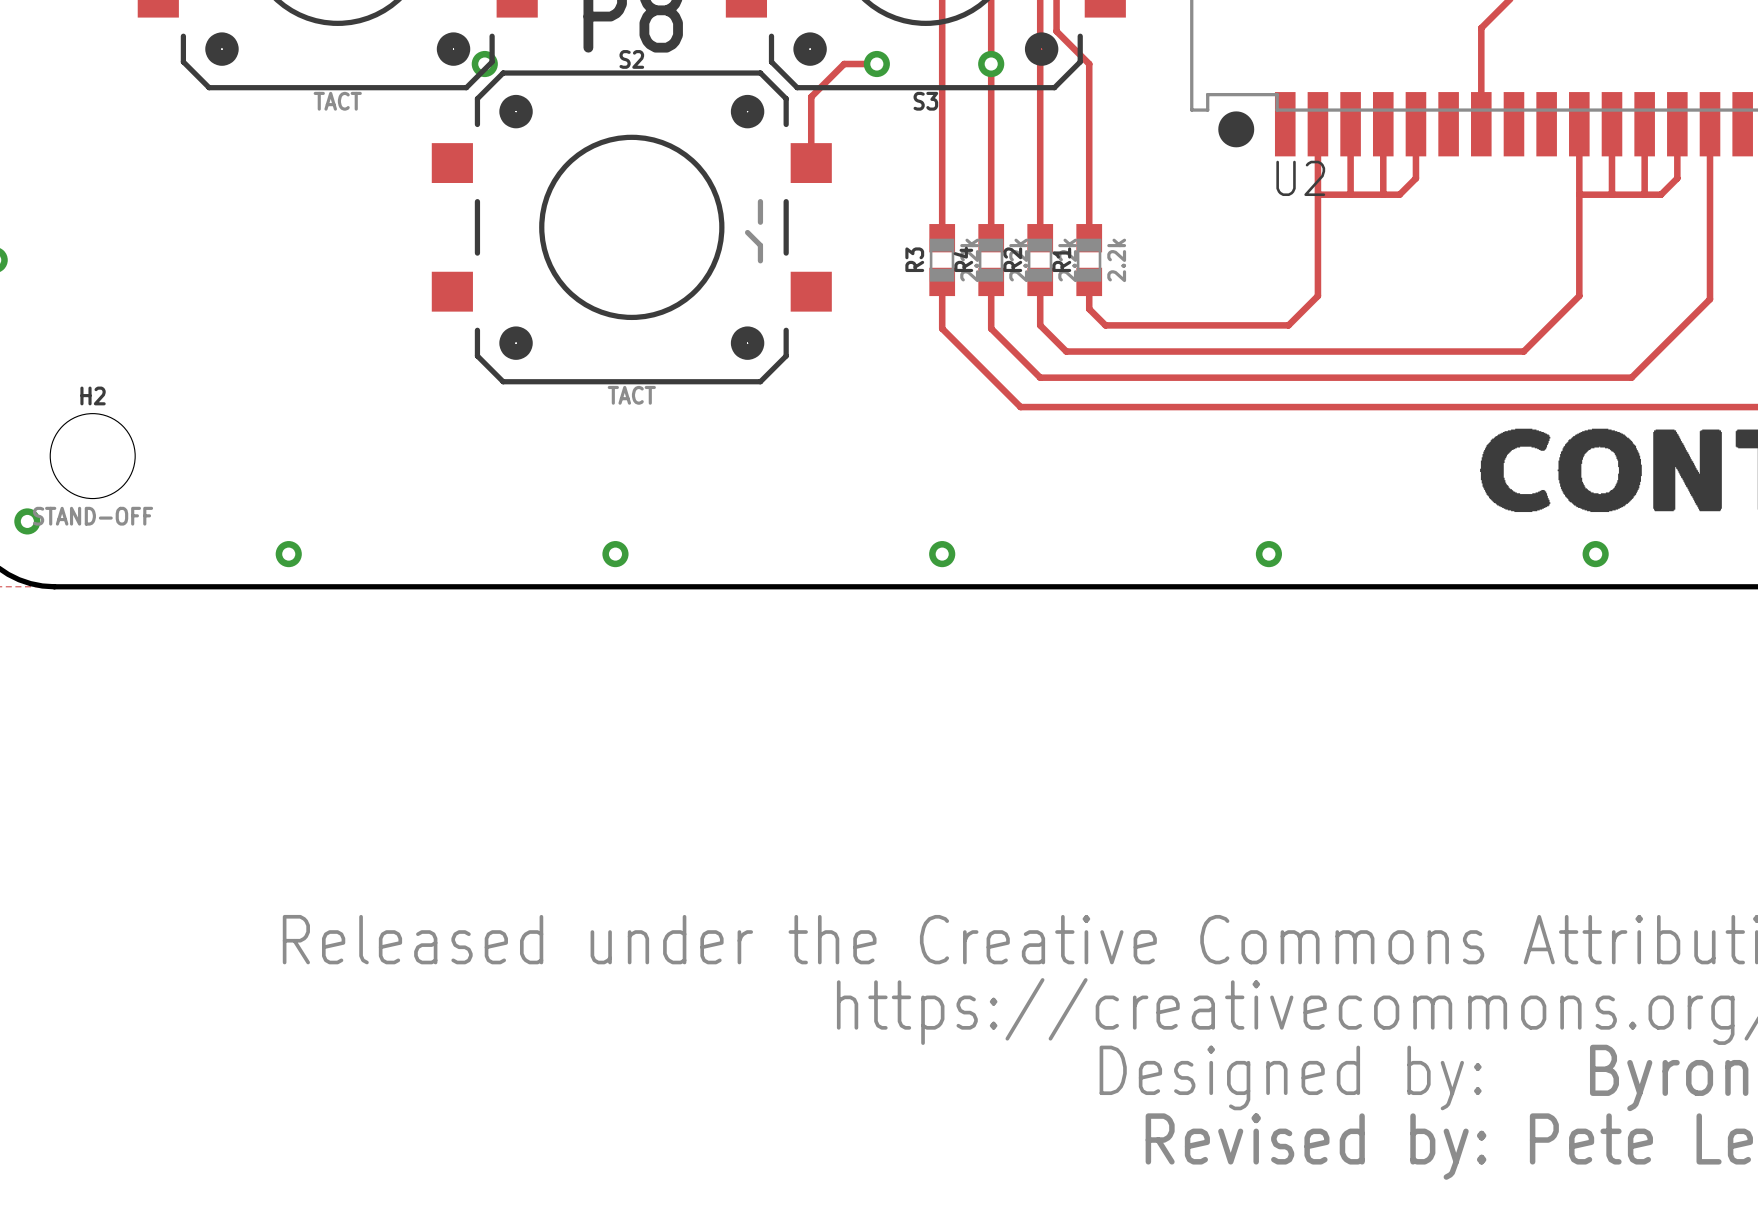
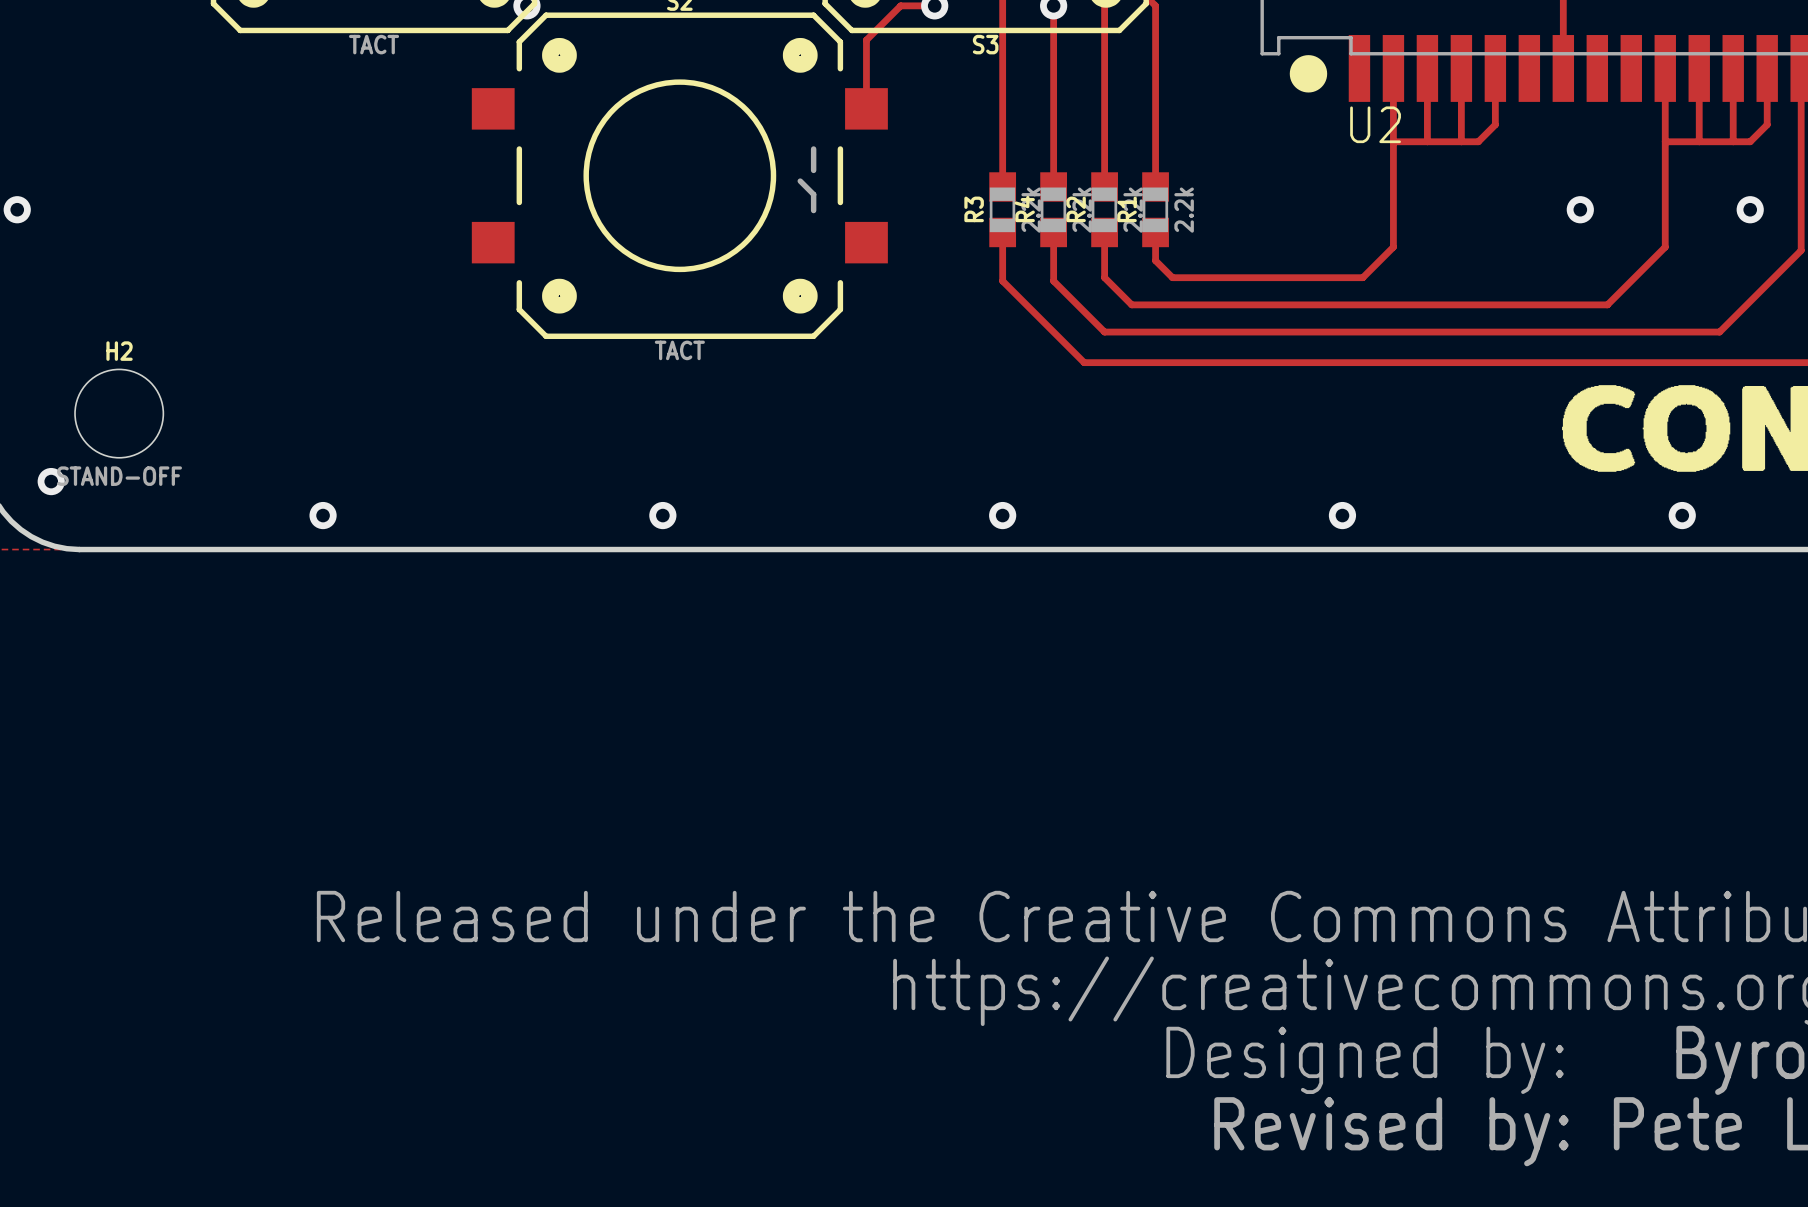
via: none -> (1580, 209)
via: none -> (1750, 209)

